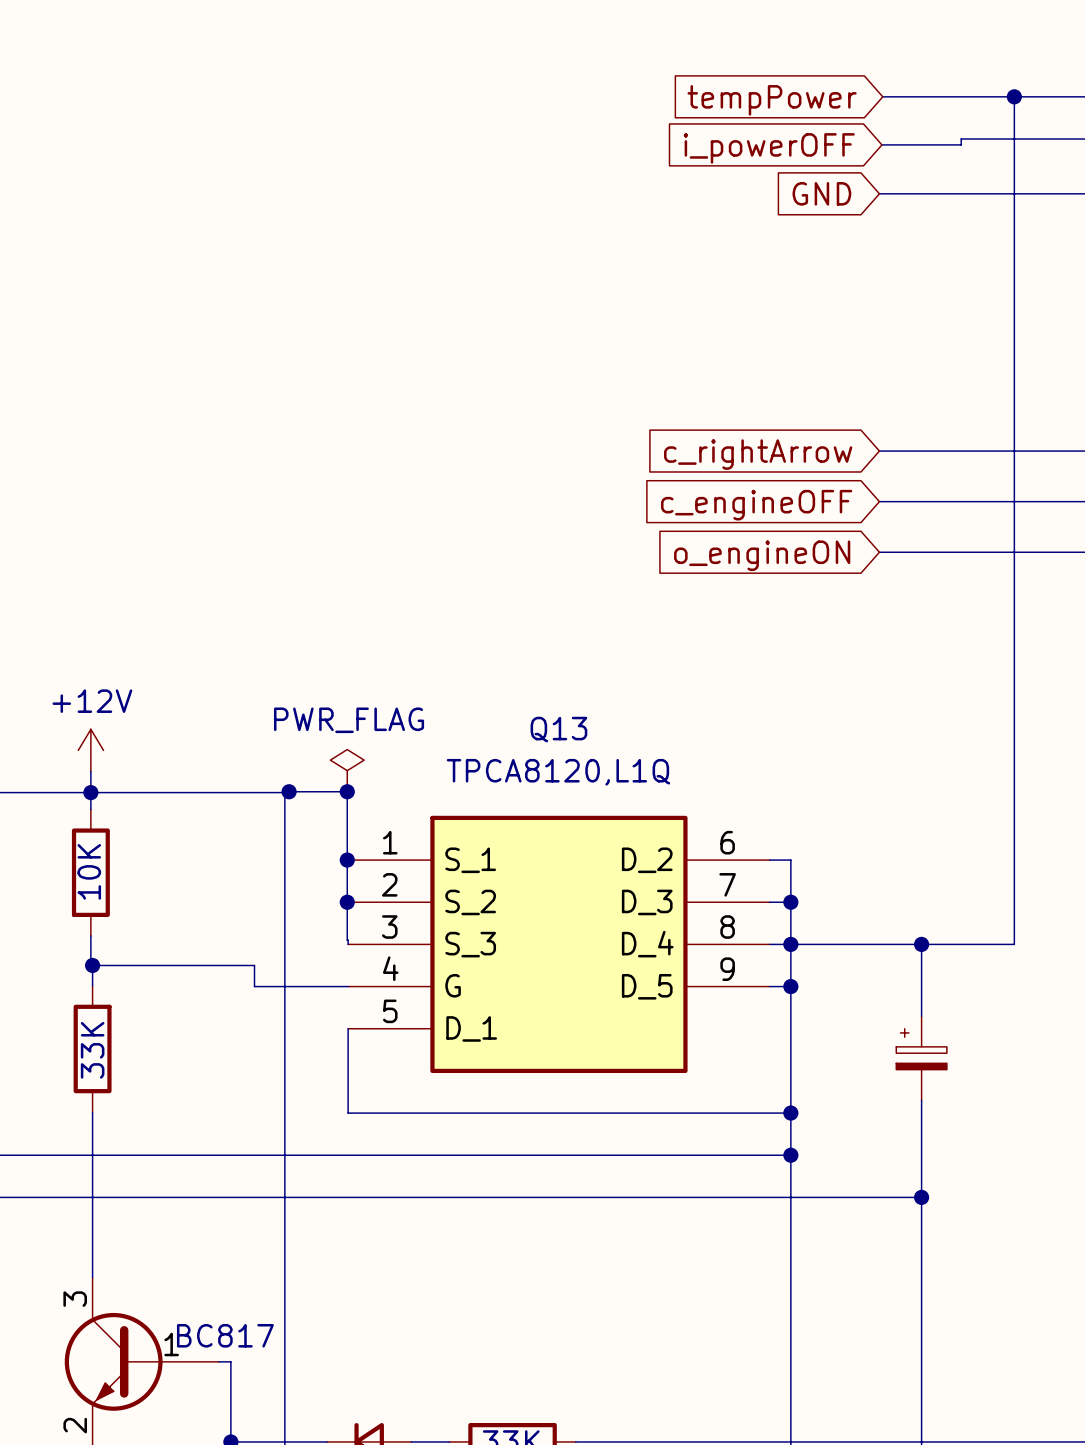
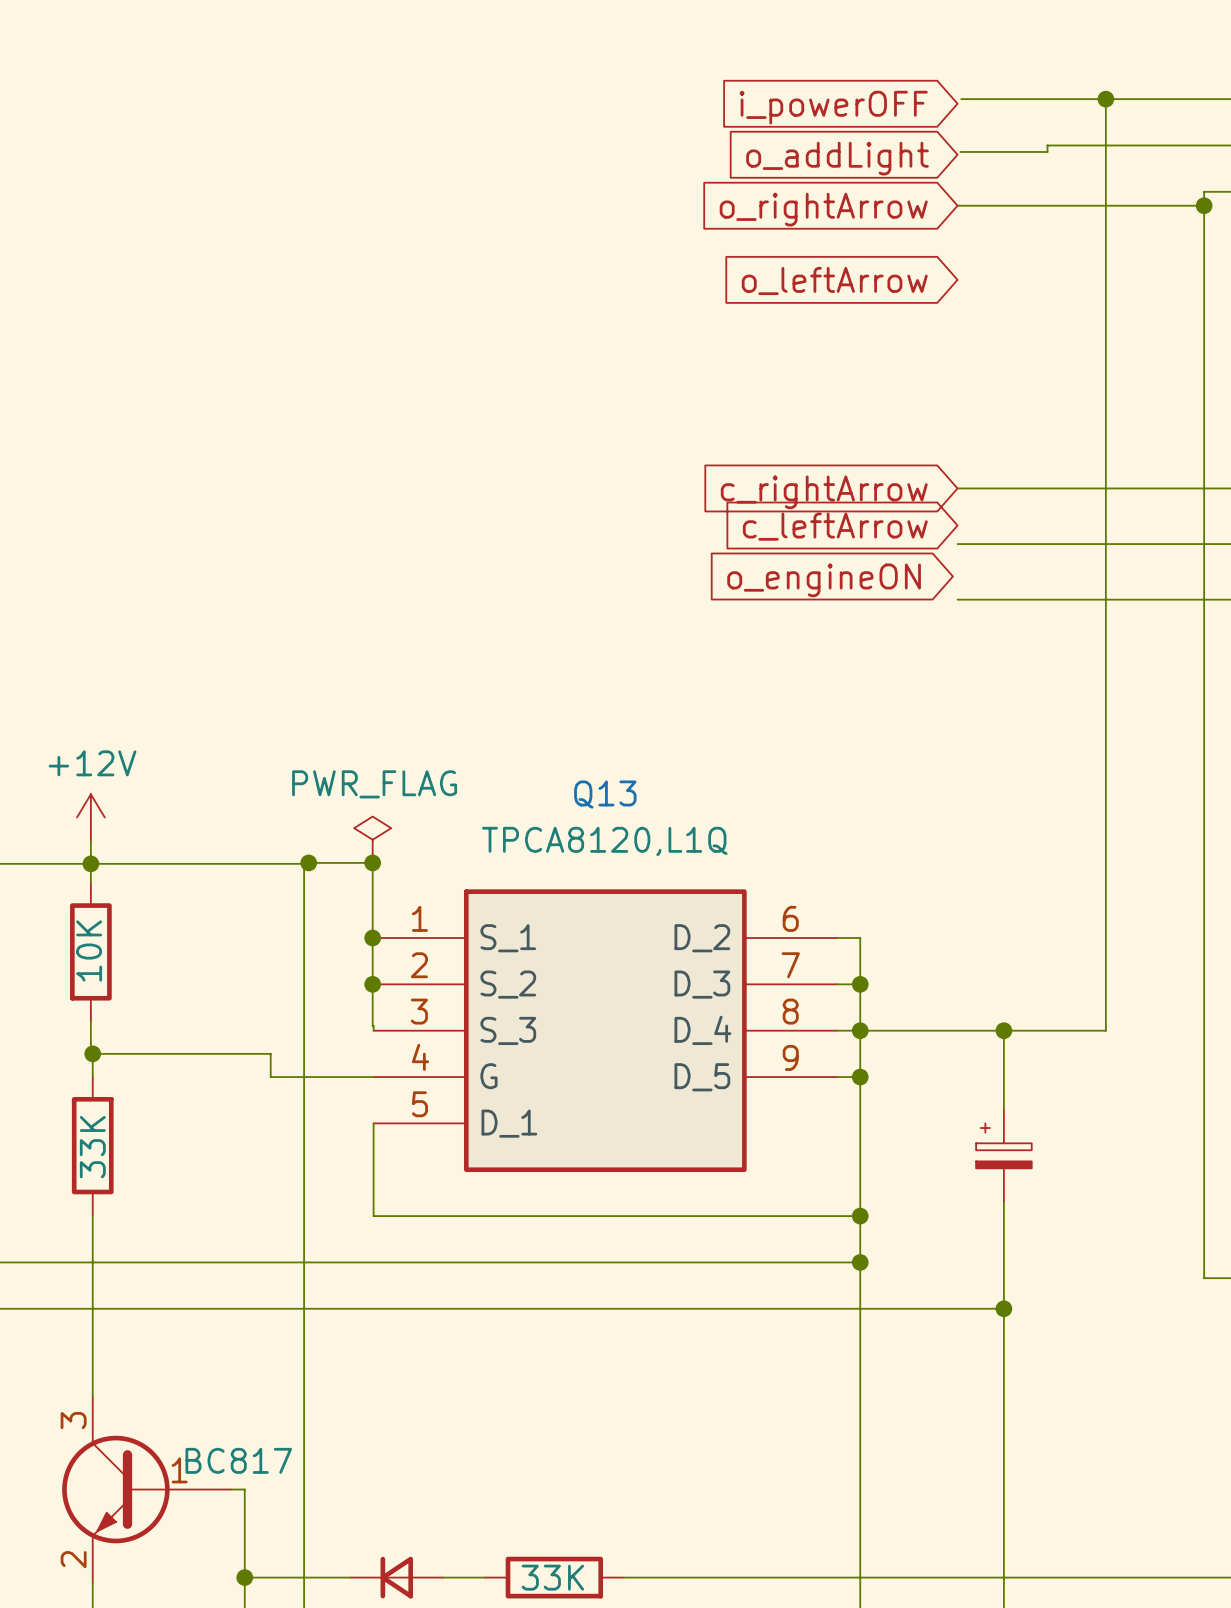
global label: tempPower (772, 100) -> none
global label position: i_powerOFF (769, 148) -> i_powerOFF (833, 107)
global label: none -> o_addLight (837, 158)
global label: GND (821, 193) -> o_rightArrow (823, 209)
global label: none -> o_leftArrow (834, 280)
global label: none -> c_leftArrow (835, 526)
global label: c_engineOFF (756, 505) -> none
global label position: o_engineON (762, 555) -> o_engineON (824, 580)

